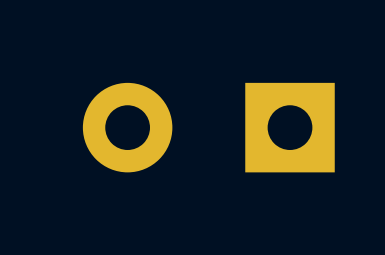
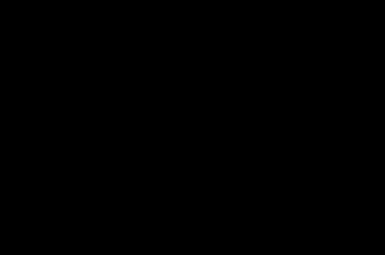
part: (208, 127) -> none

